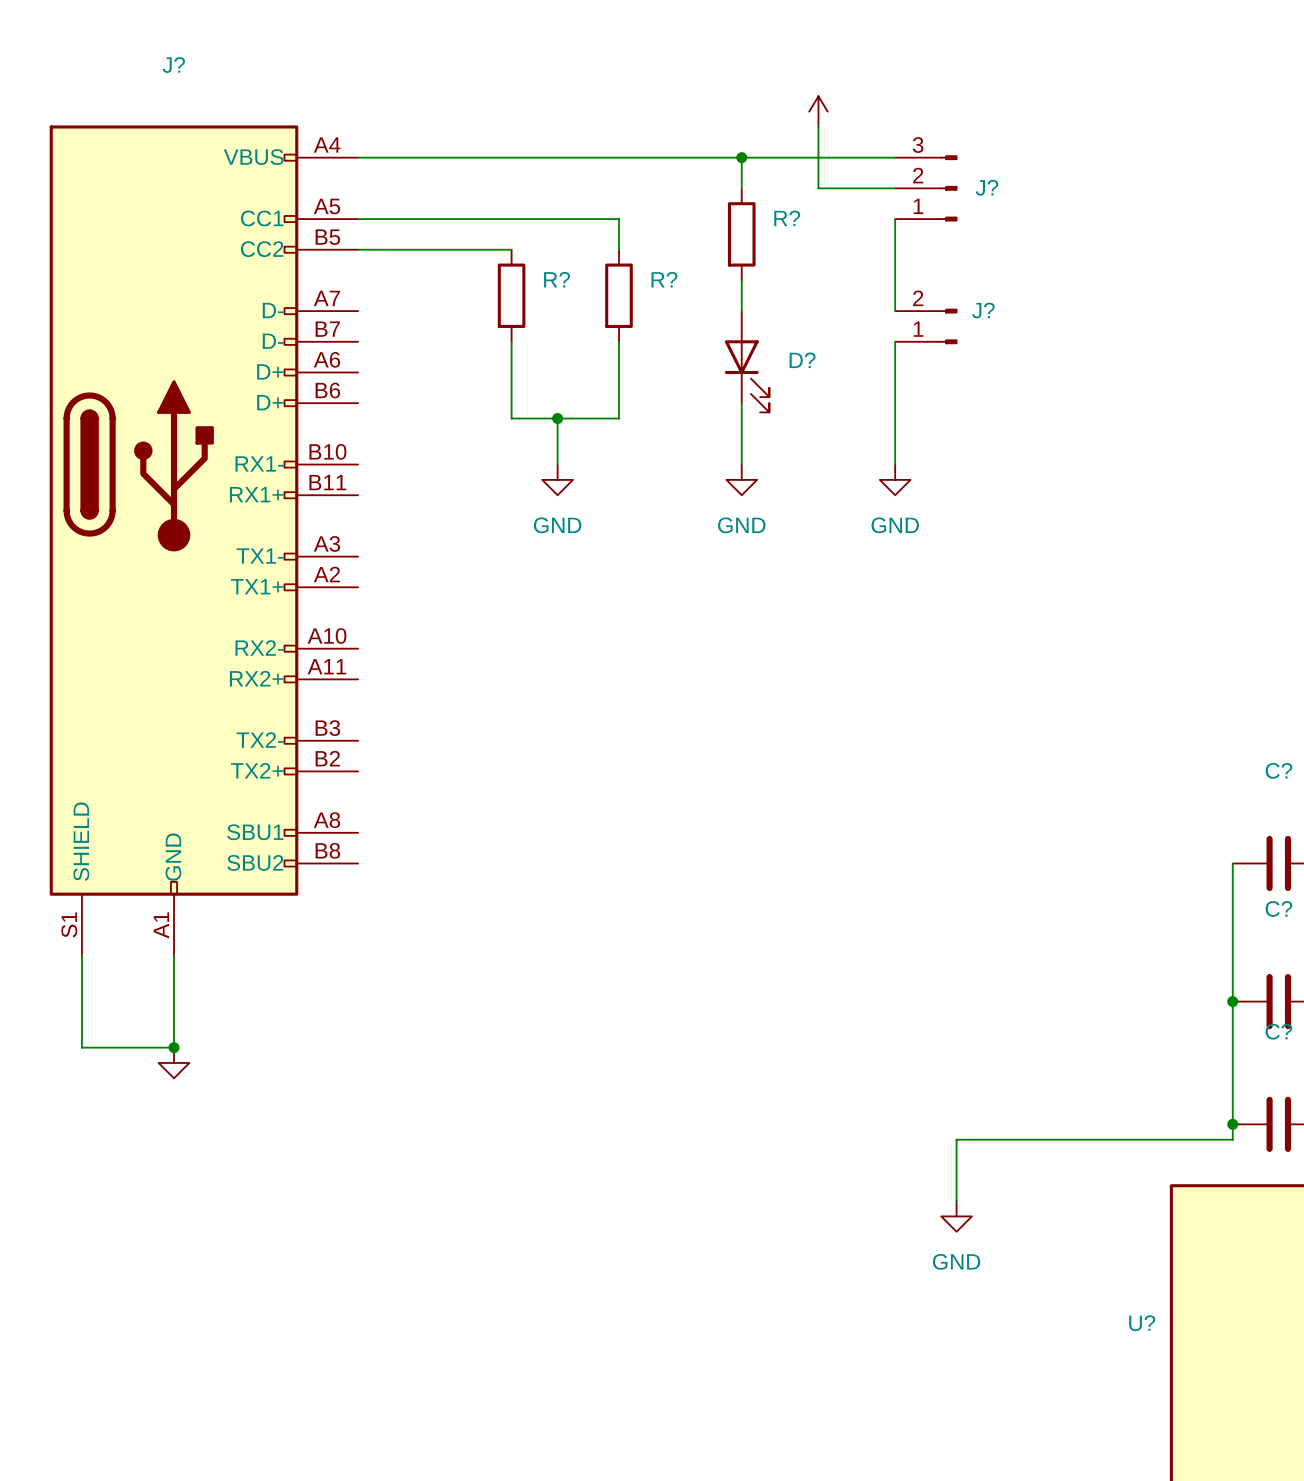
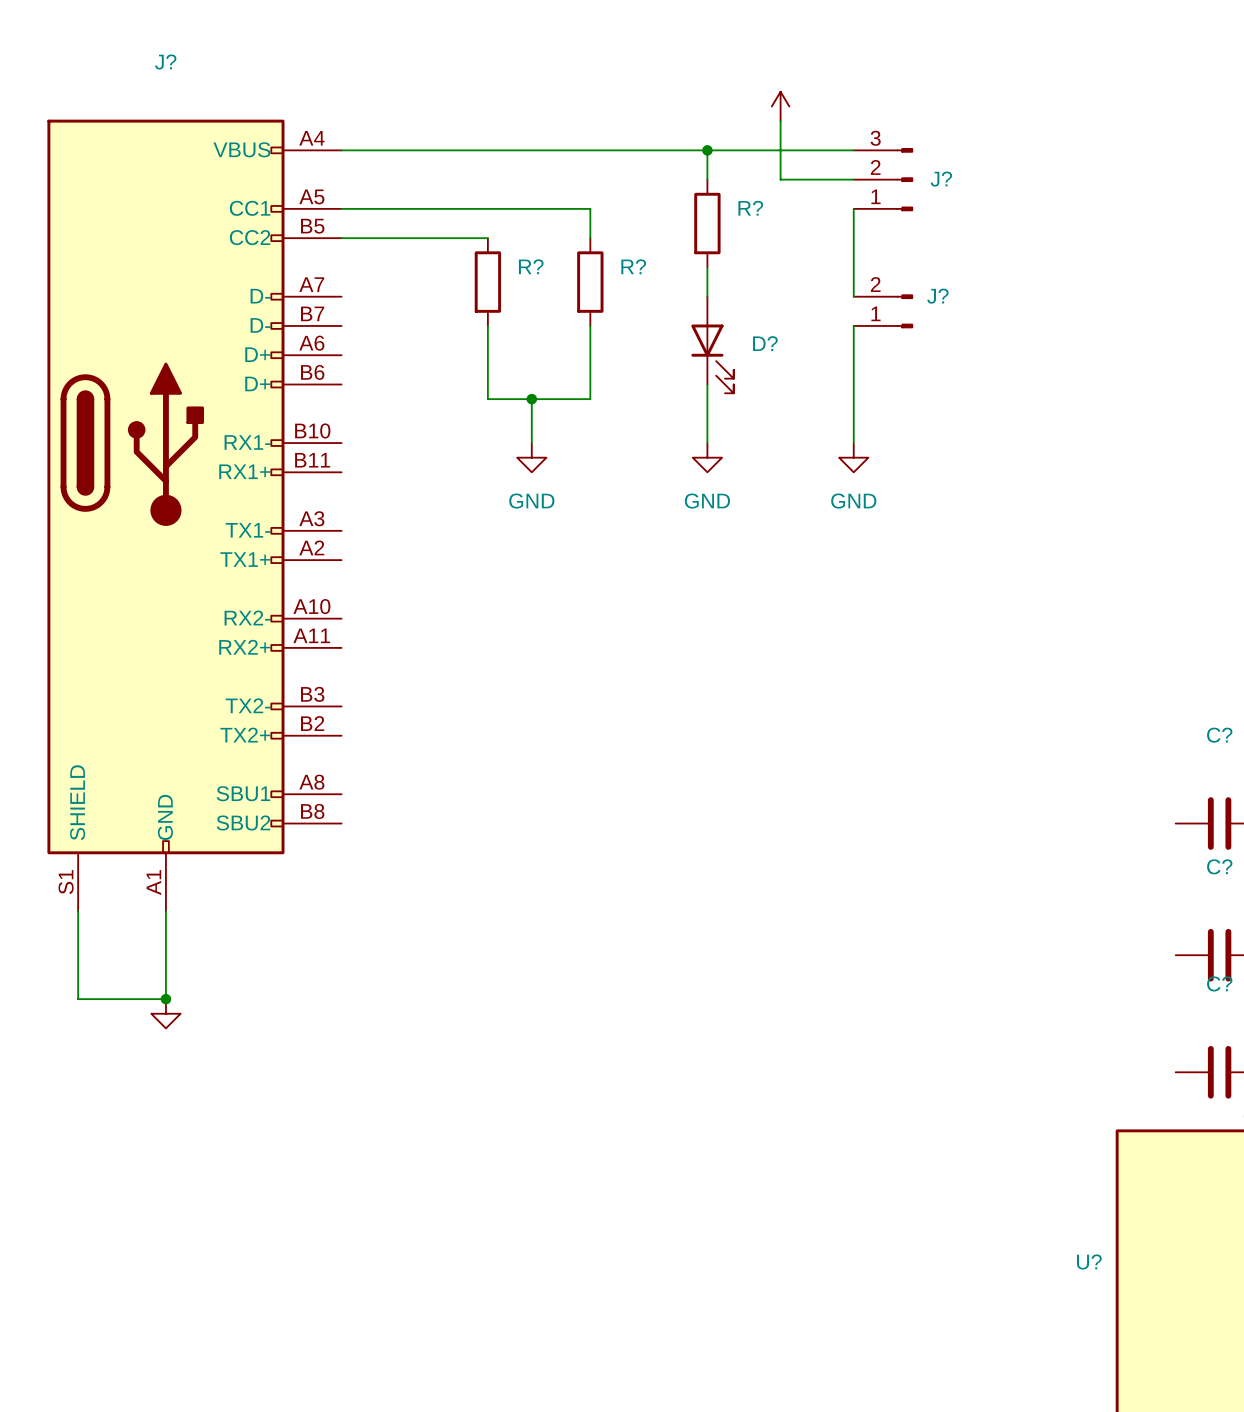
wire: (1232, 863) (1232, 1139) (956, 1139) (956, 1201) -> none
junction: (1232, 1001) -> none
junction: (1232, 1124) -> none
power symbol: GND (956, 1216) -> none

